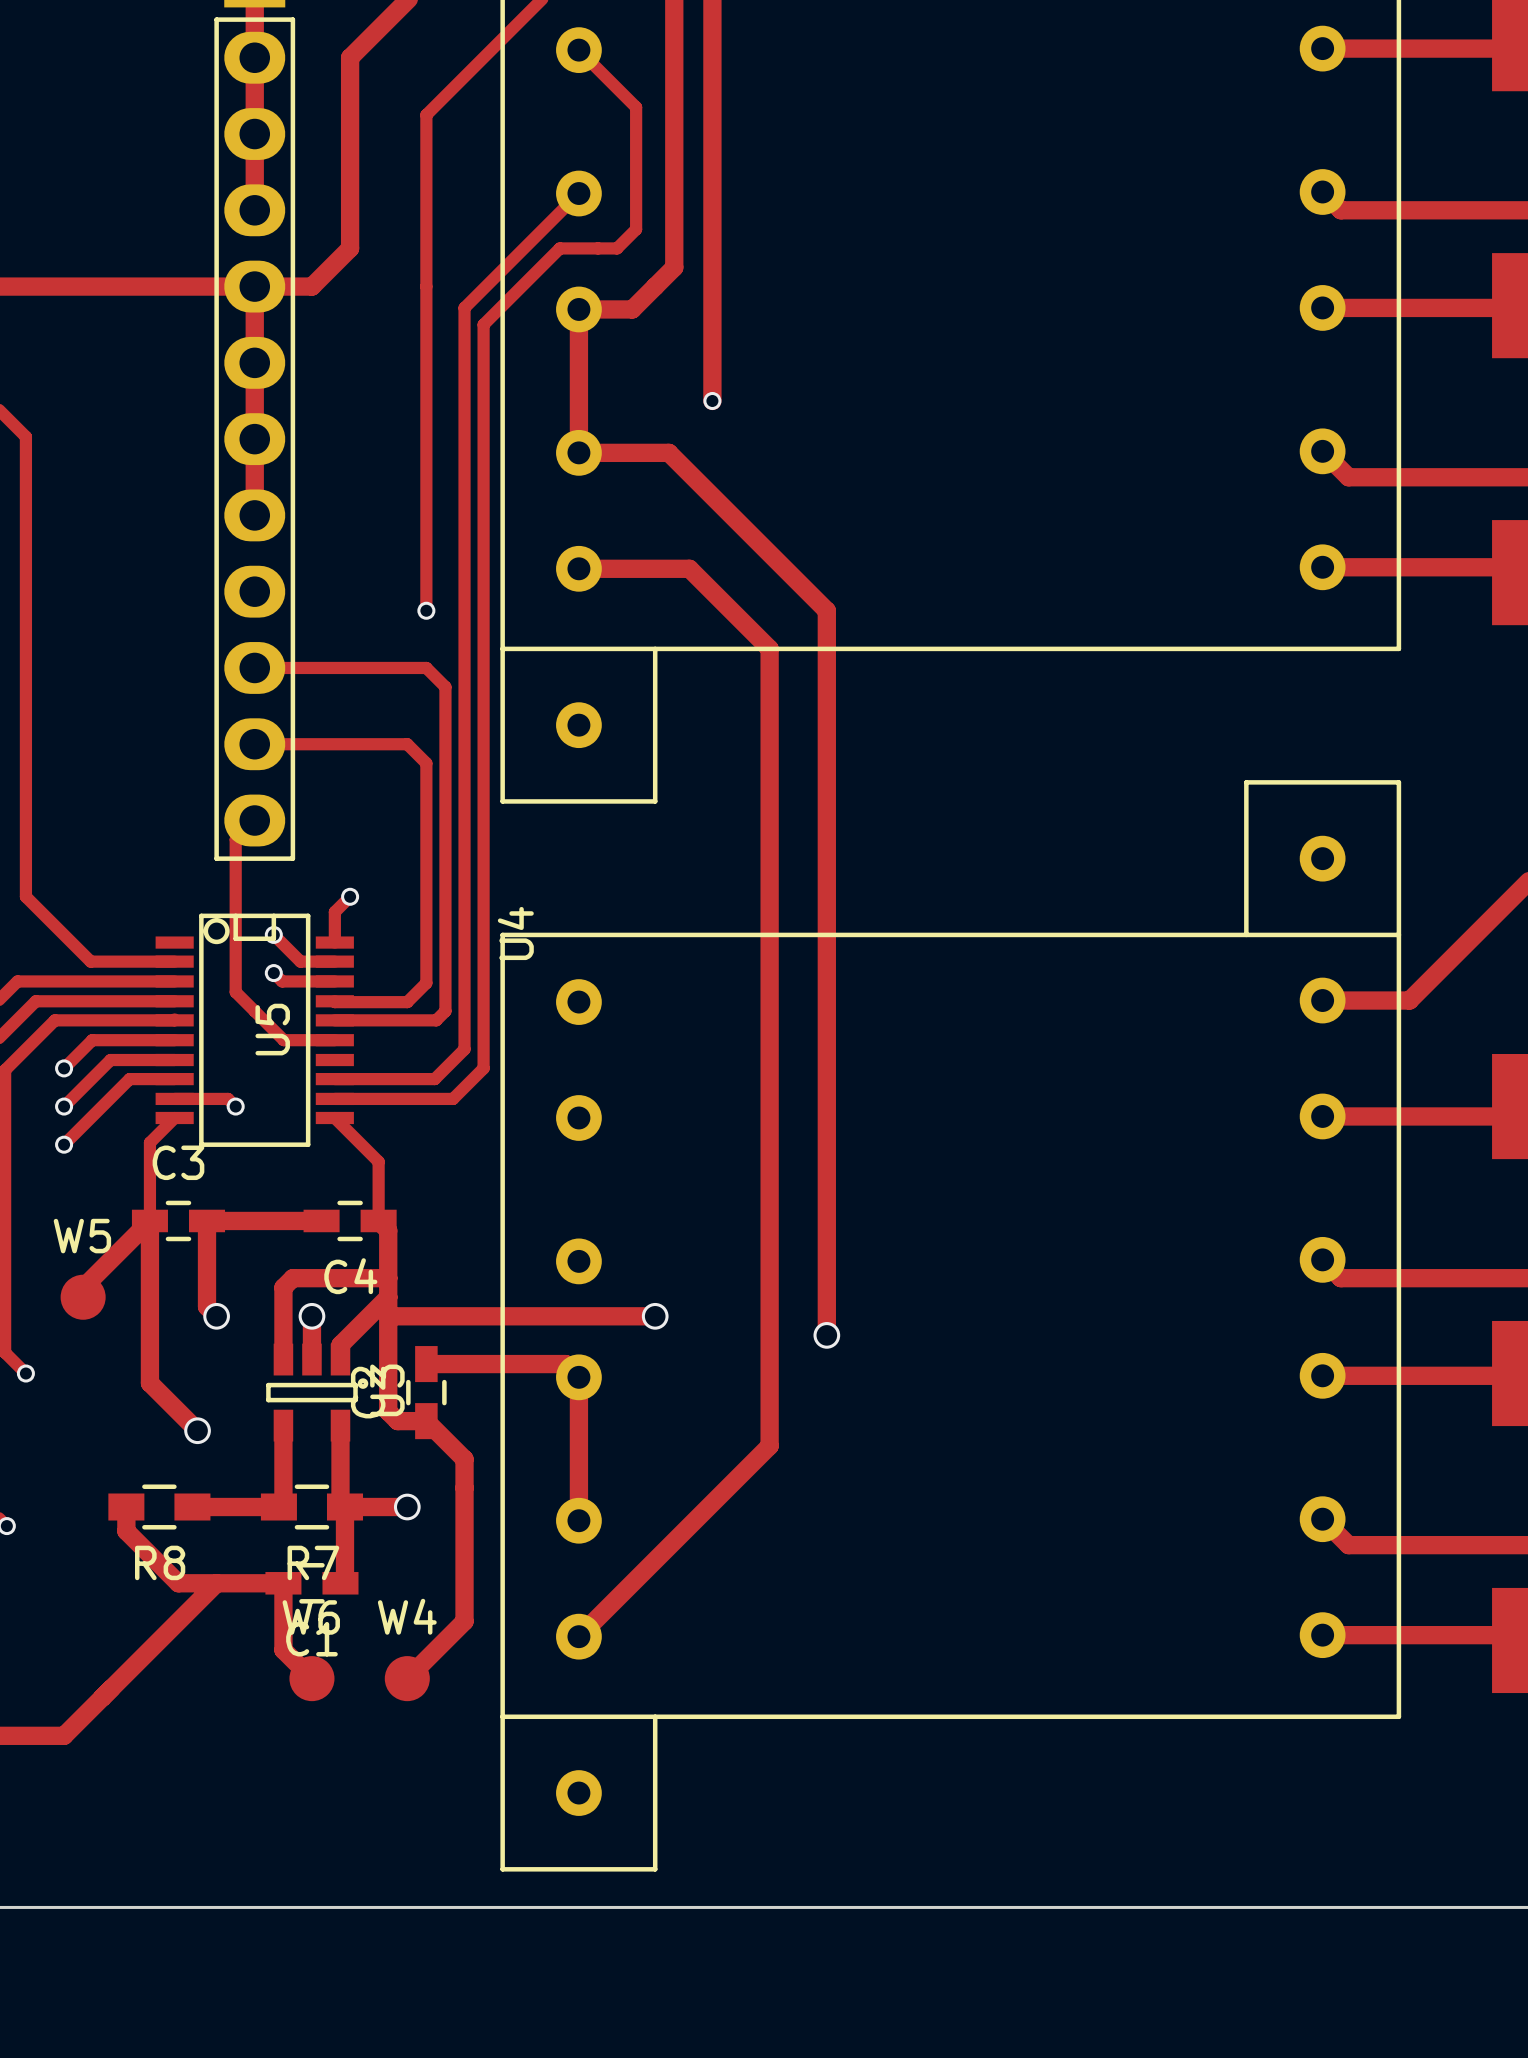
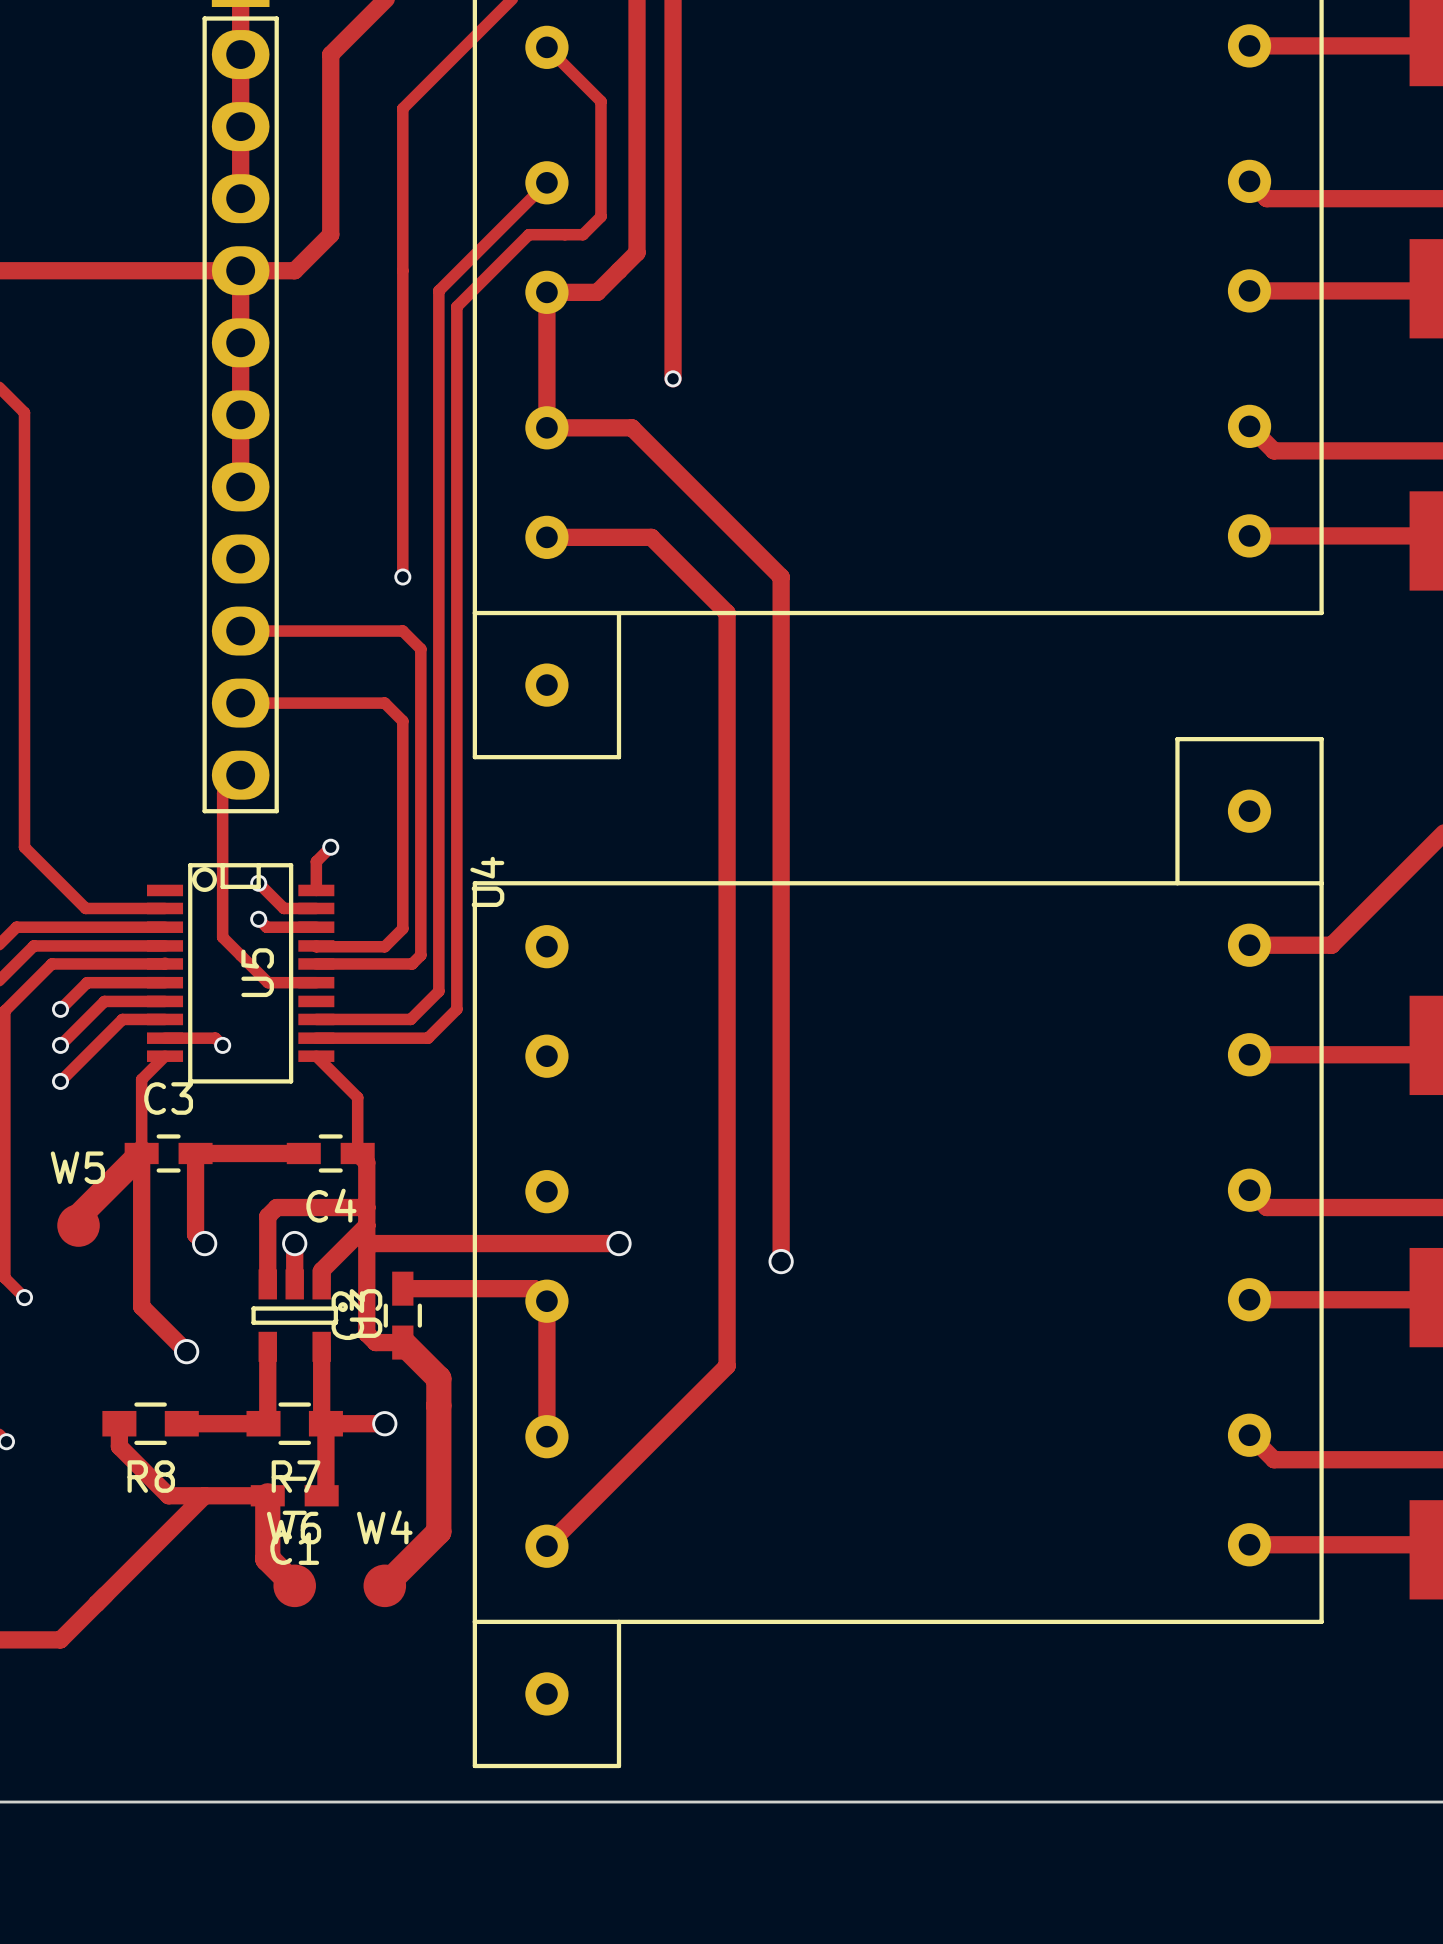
track width: thin (149, 1220) (83, 1287) (83, 1297) -> thick (141, 1153) (78, 1216) (78, 1225)
track width: thin (426, 1421) (464, 1459) (464, 1621) (407, 1678) -> thick (402, 1342) (438, 1378) (438, 1531) (384, 1585)
track width: thin (283, 1583) (283, 1650) (311, 1678) -> thick (267, 1495) (267, 1558) (294, 1585)

